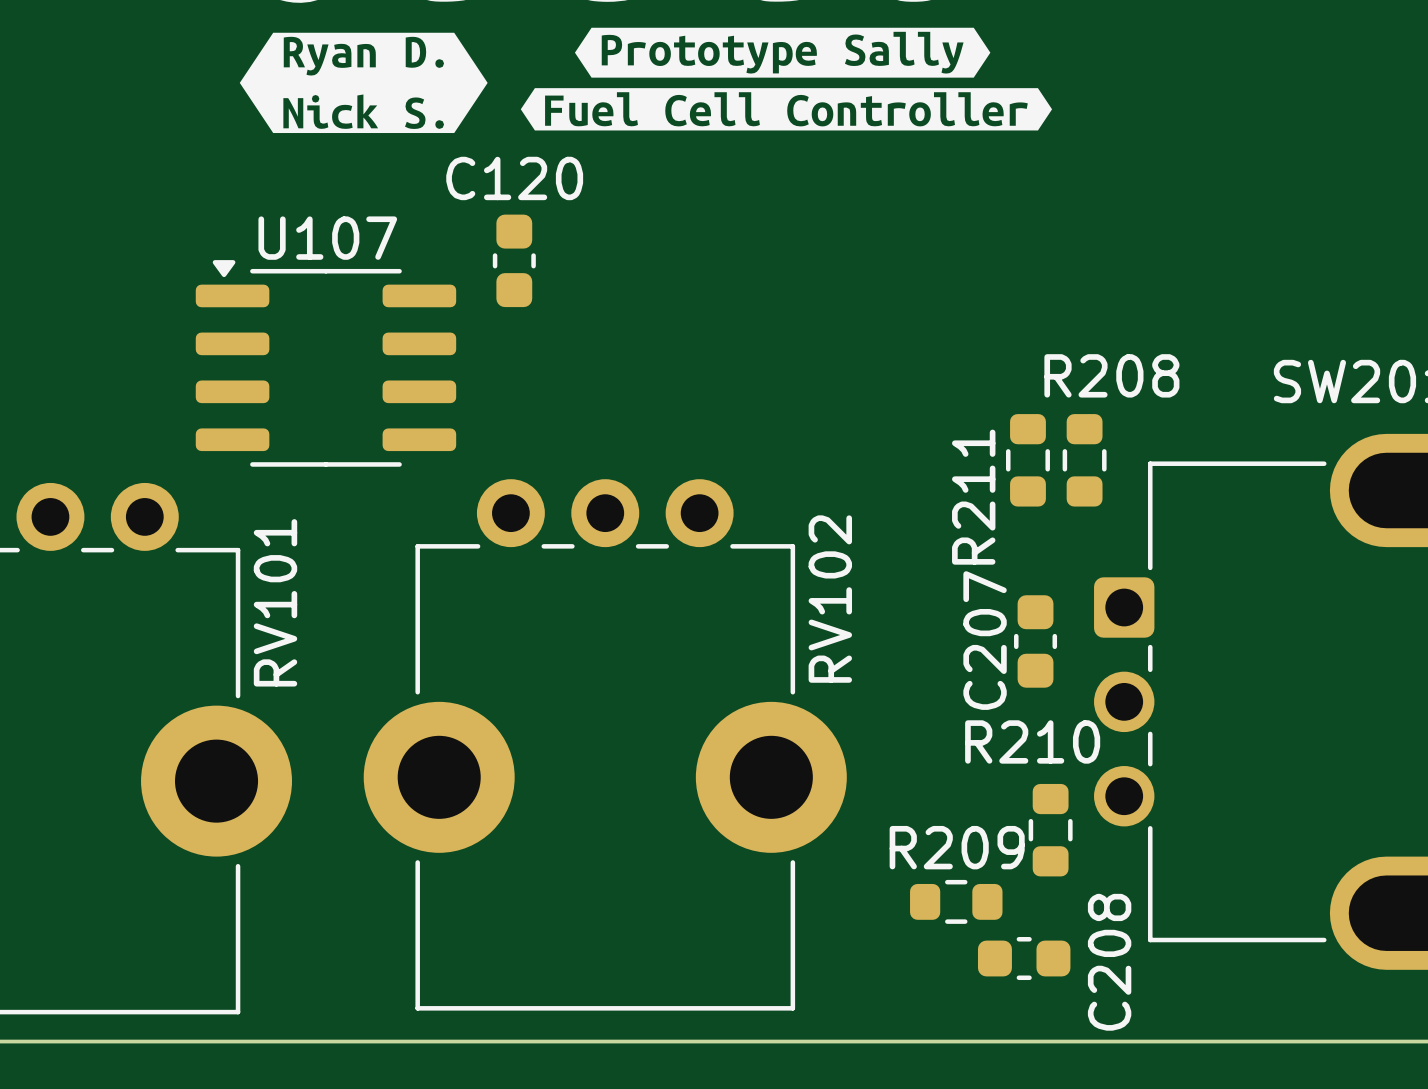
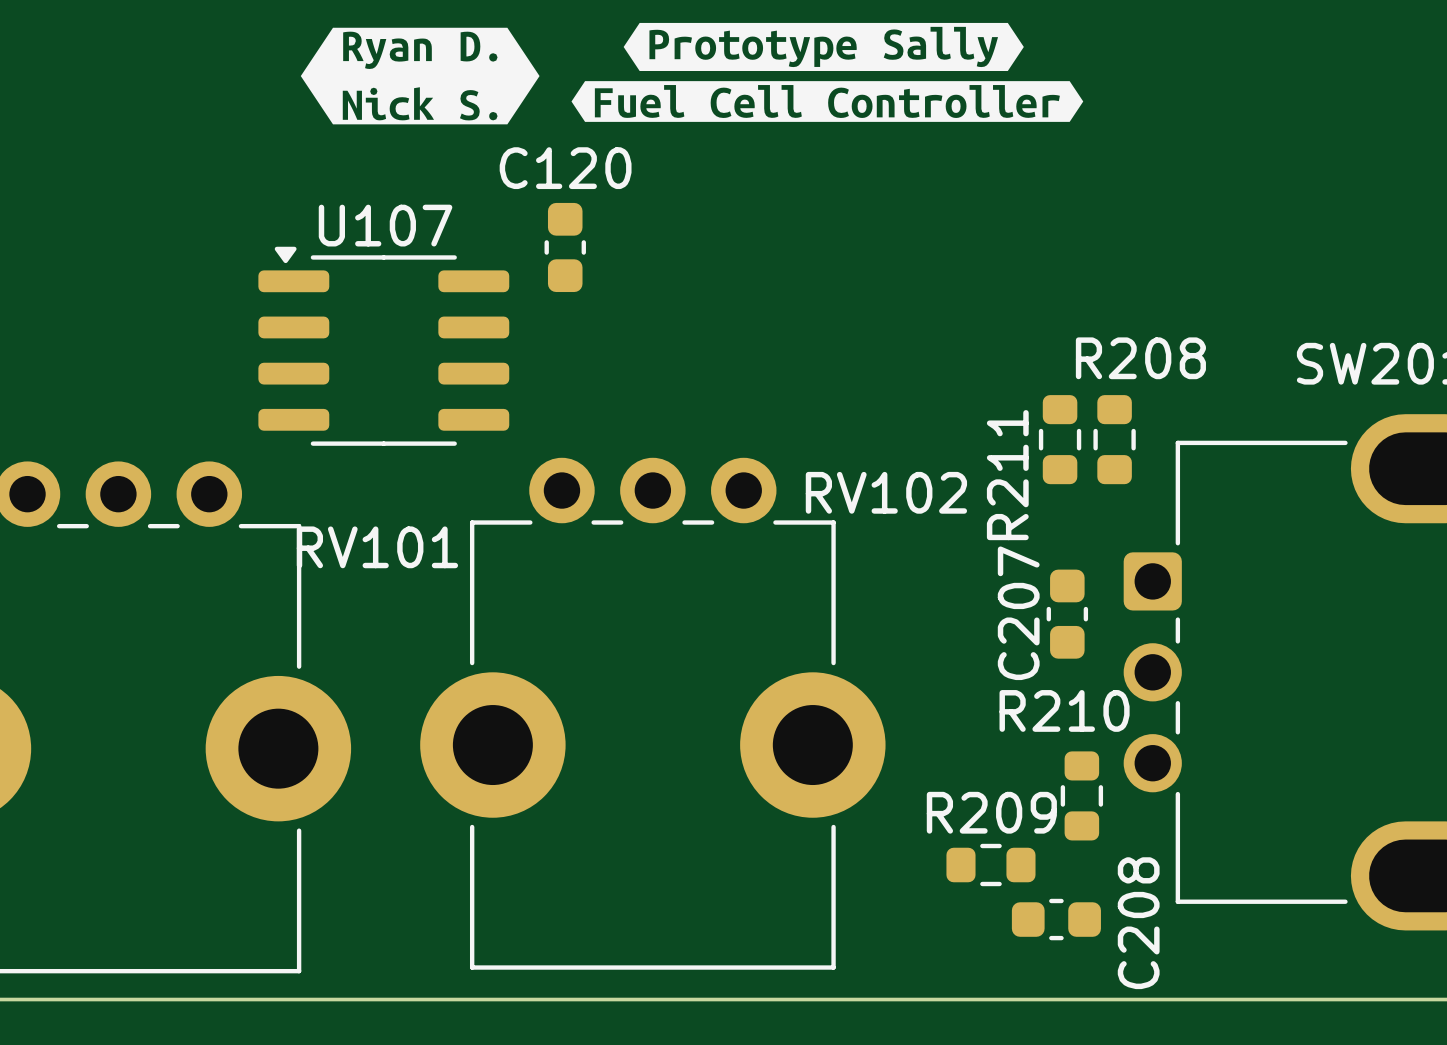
RV102 name rotation: 0° (830, 599) -> 90° clockwise (886, 492)
RV101 name rotation: 0° (275, 602) -> 90° clockwise (377, 547)

